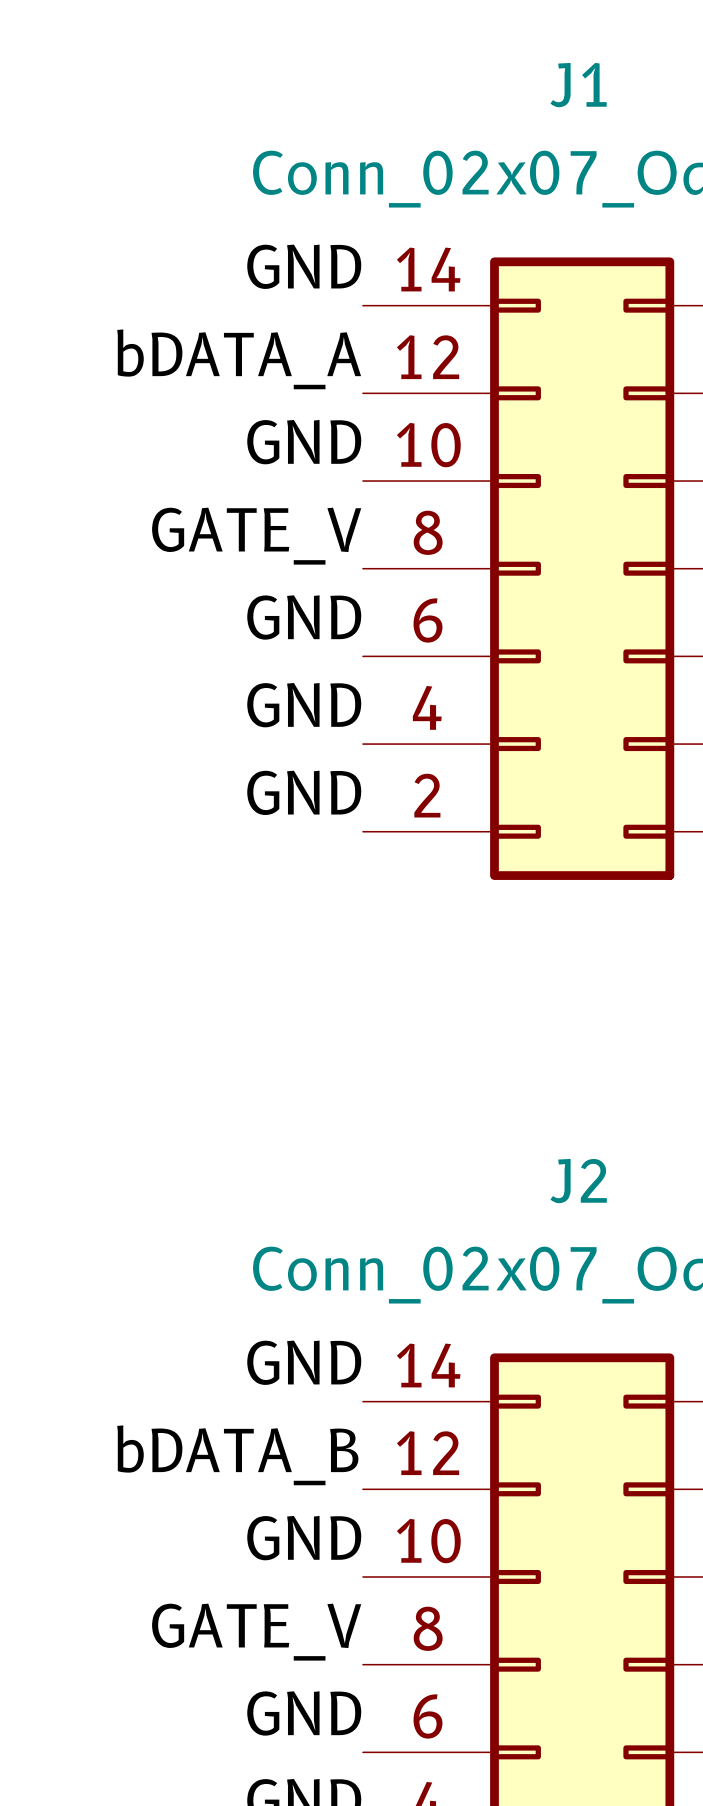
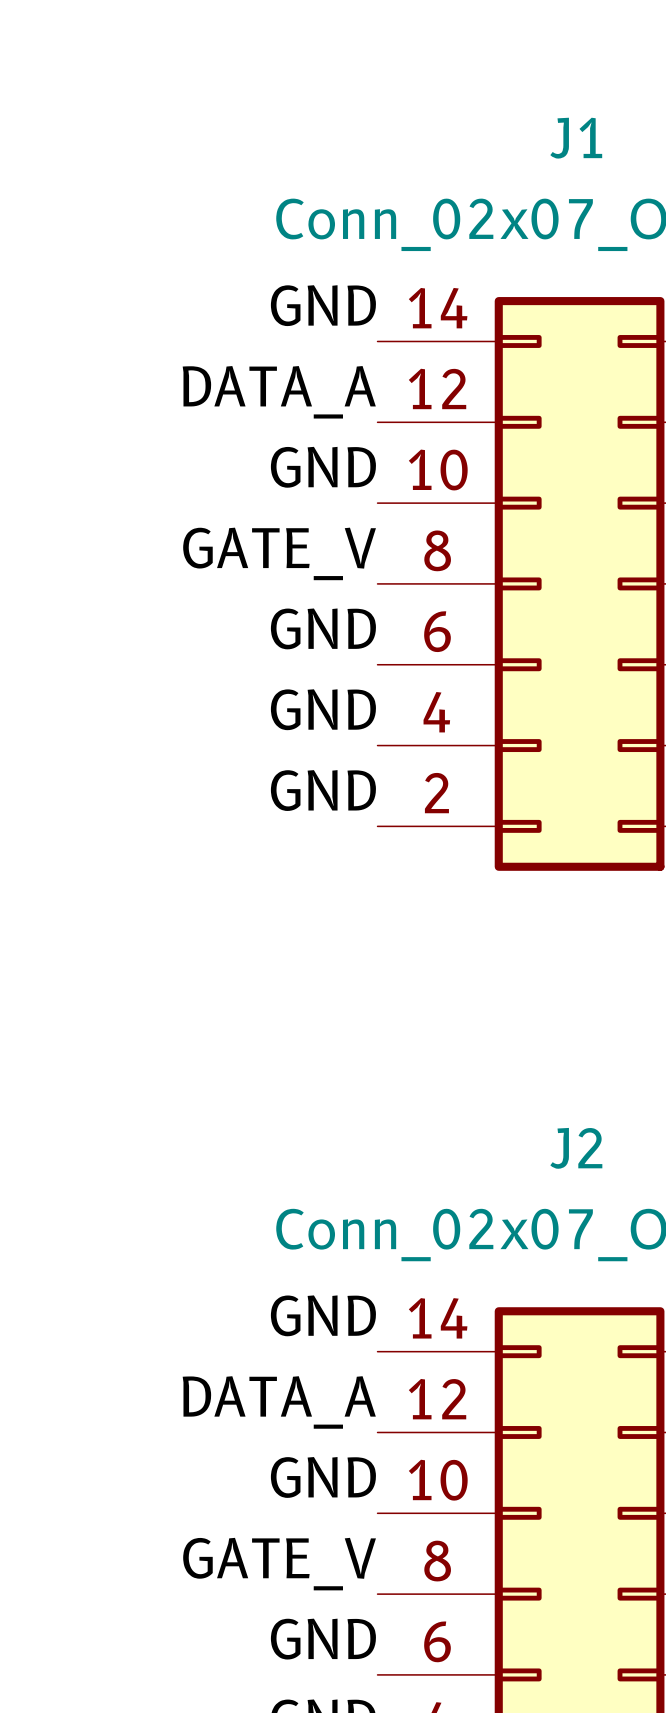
label: bDATA_A (239, 359) -> DATA_A (279, 392)
label: bDATA_B (237, 1455) -> DATA_A (279, 1402)

